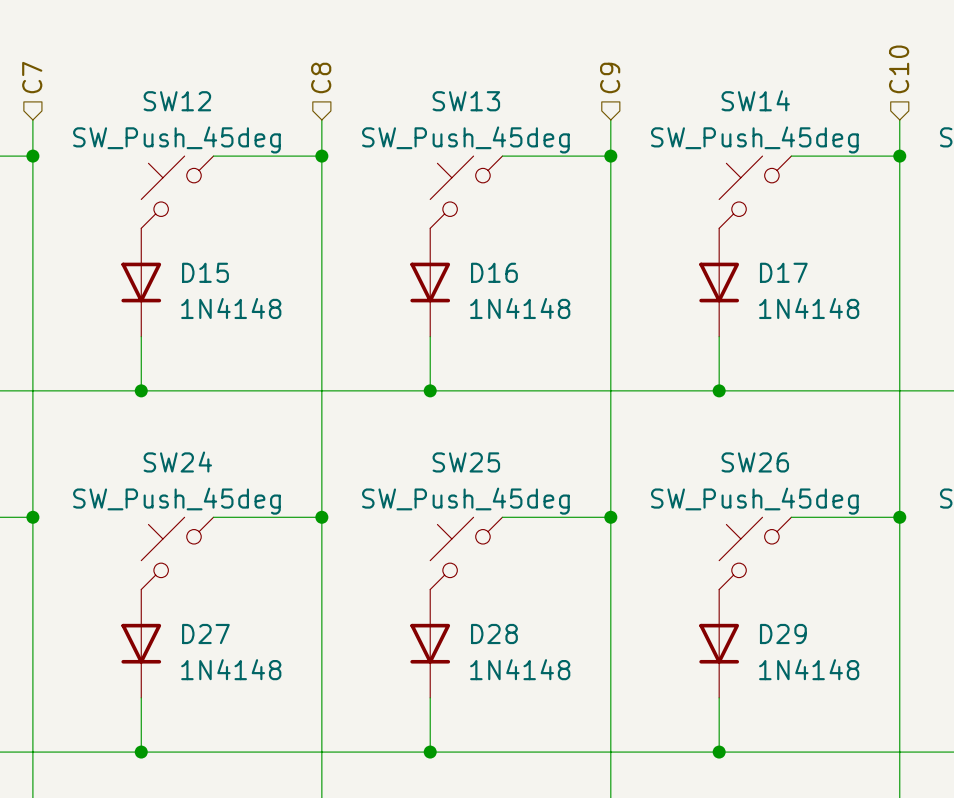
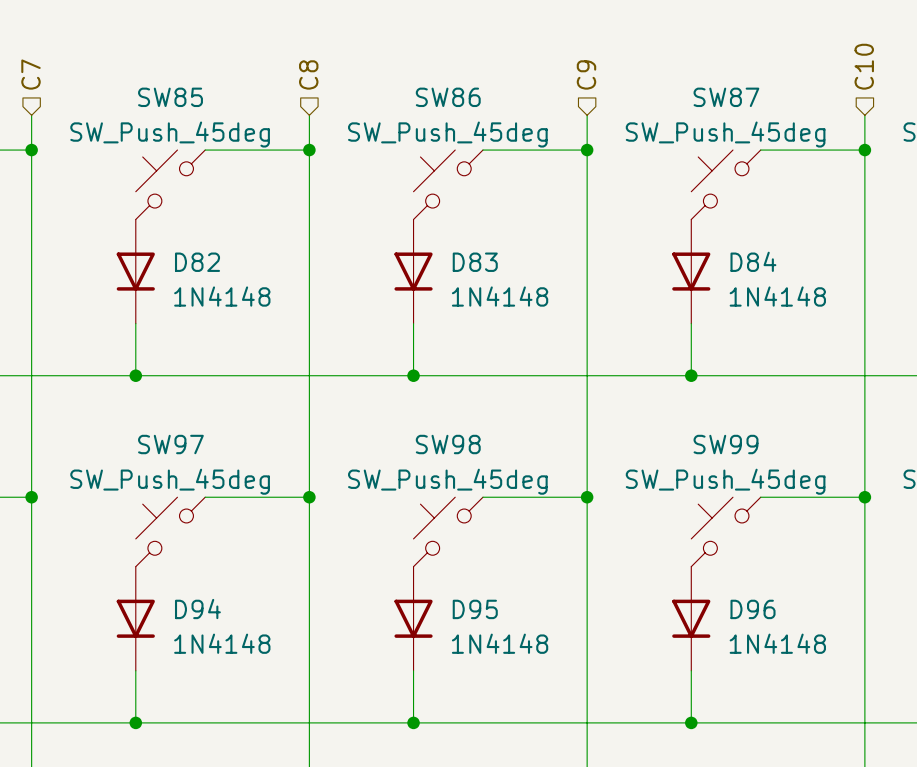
SW14 name: SW14 (755, 100) -> SW87 (726, 97)
SW12 name: SW12 (177, 101) -> SW85 (170, 97)
SW13 name: SW13 (466, 101) -> SW86 (448, 97)
D15 name: D15 (205, 272) -> D82 (197, 262)
D16 name: D16 (494, 272) -> D83 (475, 262)
D17 name: D17 (783, 272) -> D84 (753, 261)
SW24 name: SW24 (177, 462) -> SW97 (170, 444)
SW25 name: SW25 (466, 462) -> SW98 (448, 444)
SW26 name: SW26 (755, 462) -> SW99 (726, 444)
D27 name: D27 (205, 634) -> D94 (197, 609)
D28 name: D28 (494, 634) -> D95 (475, 609)
D29 name: D29 (783, 634) -> D96 (753, 609)

